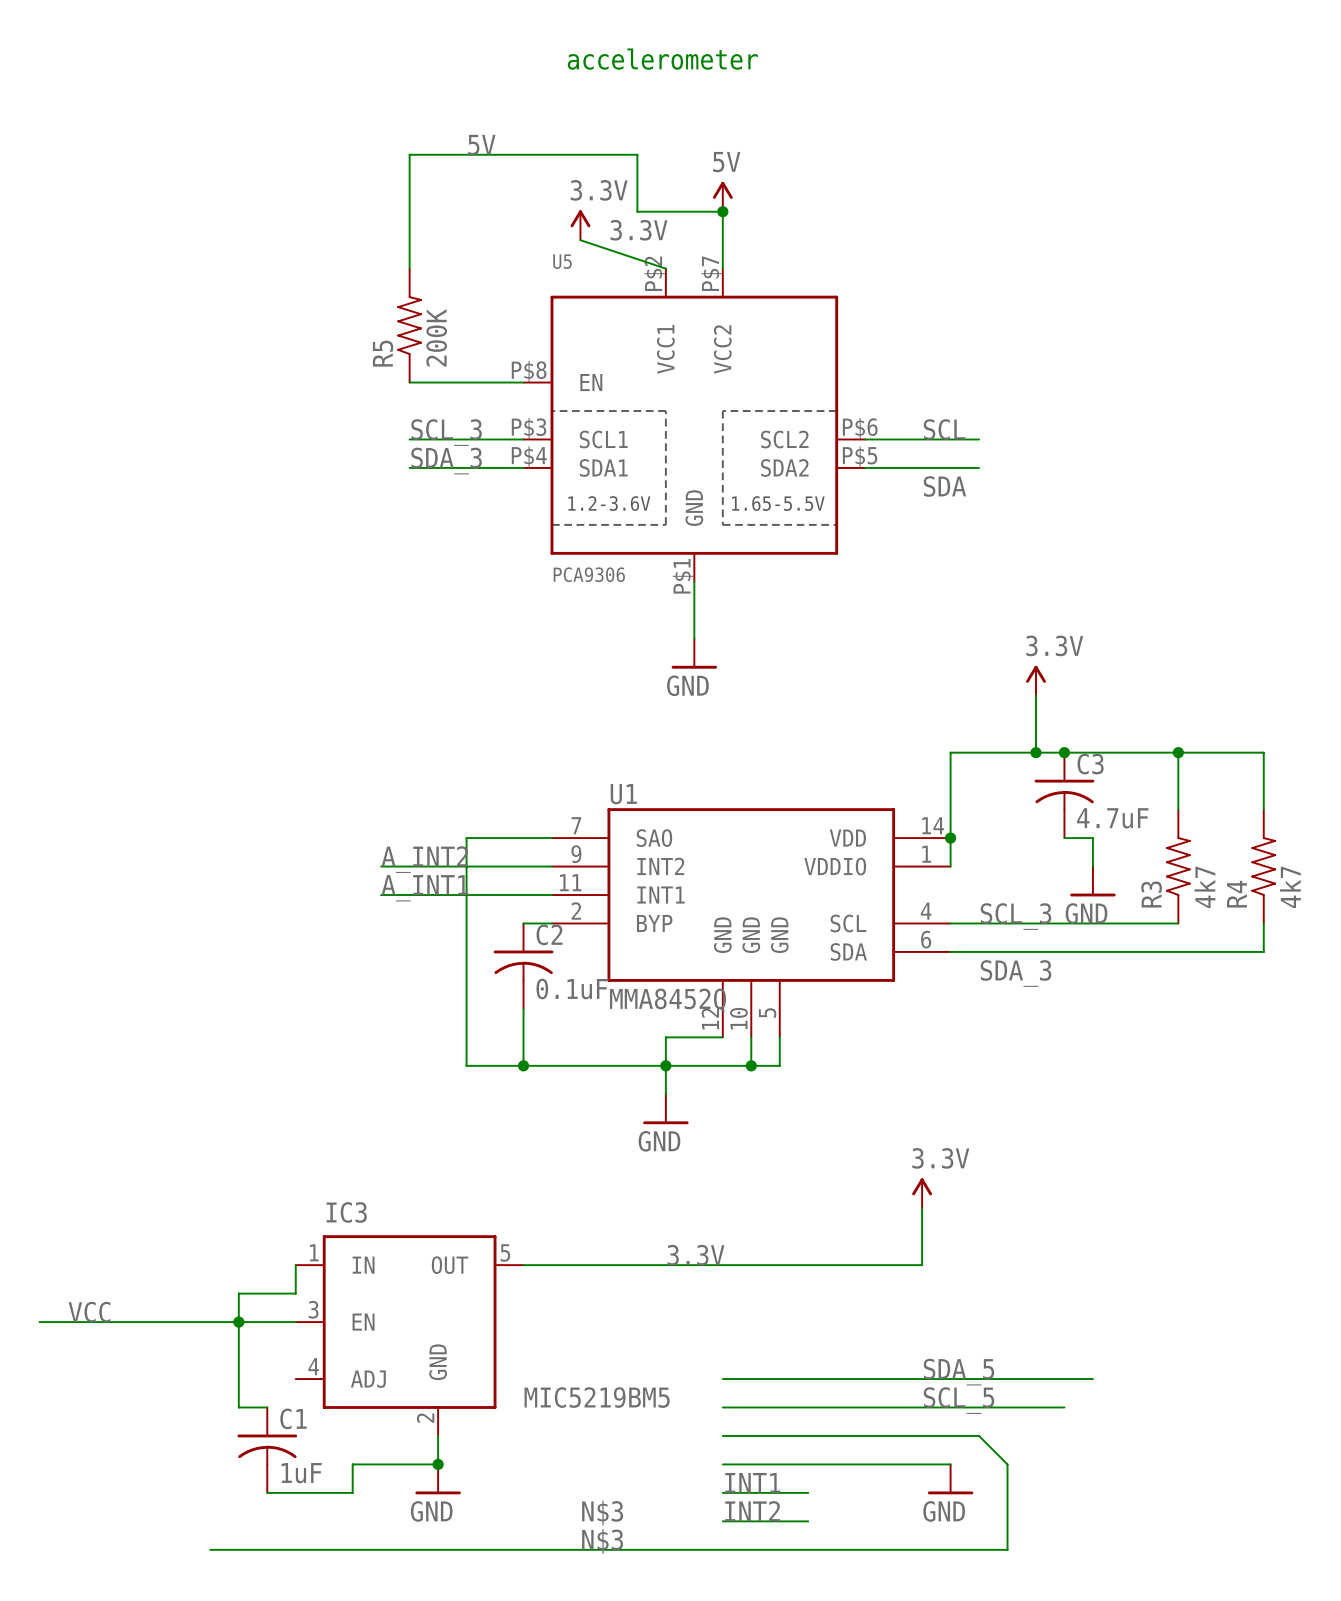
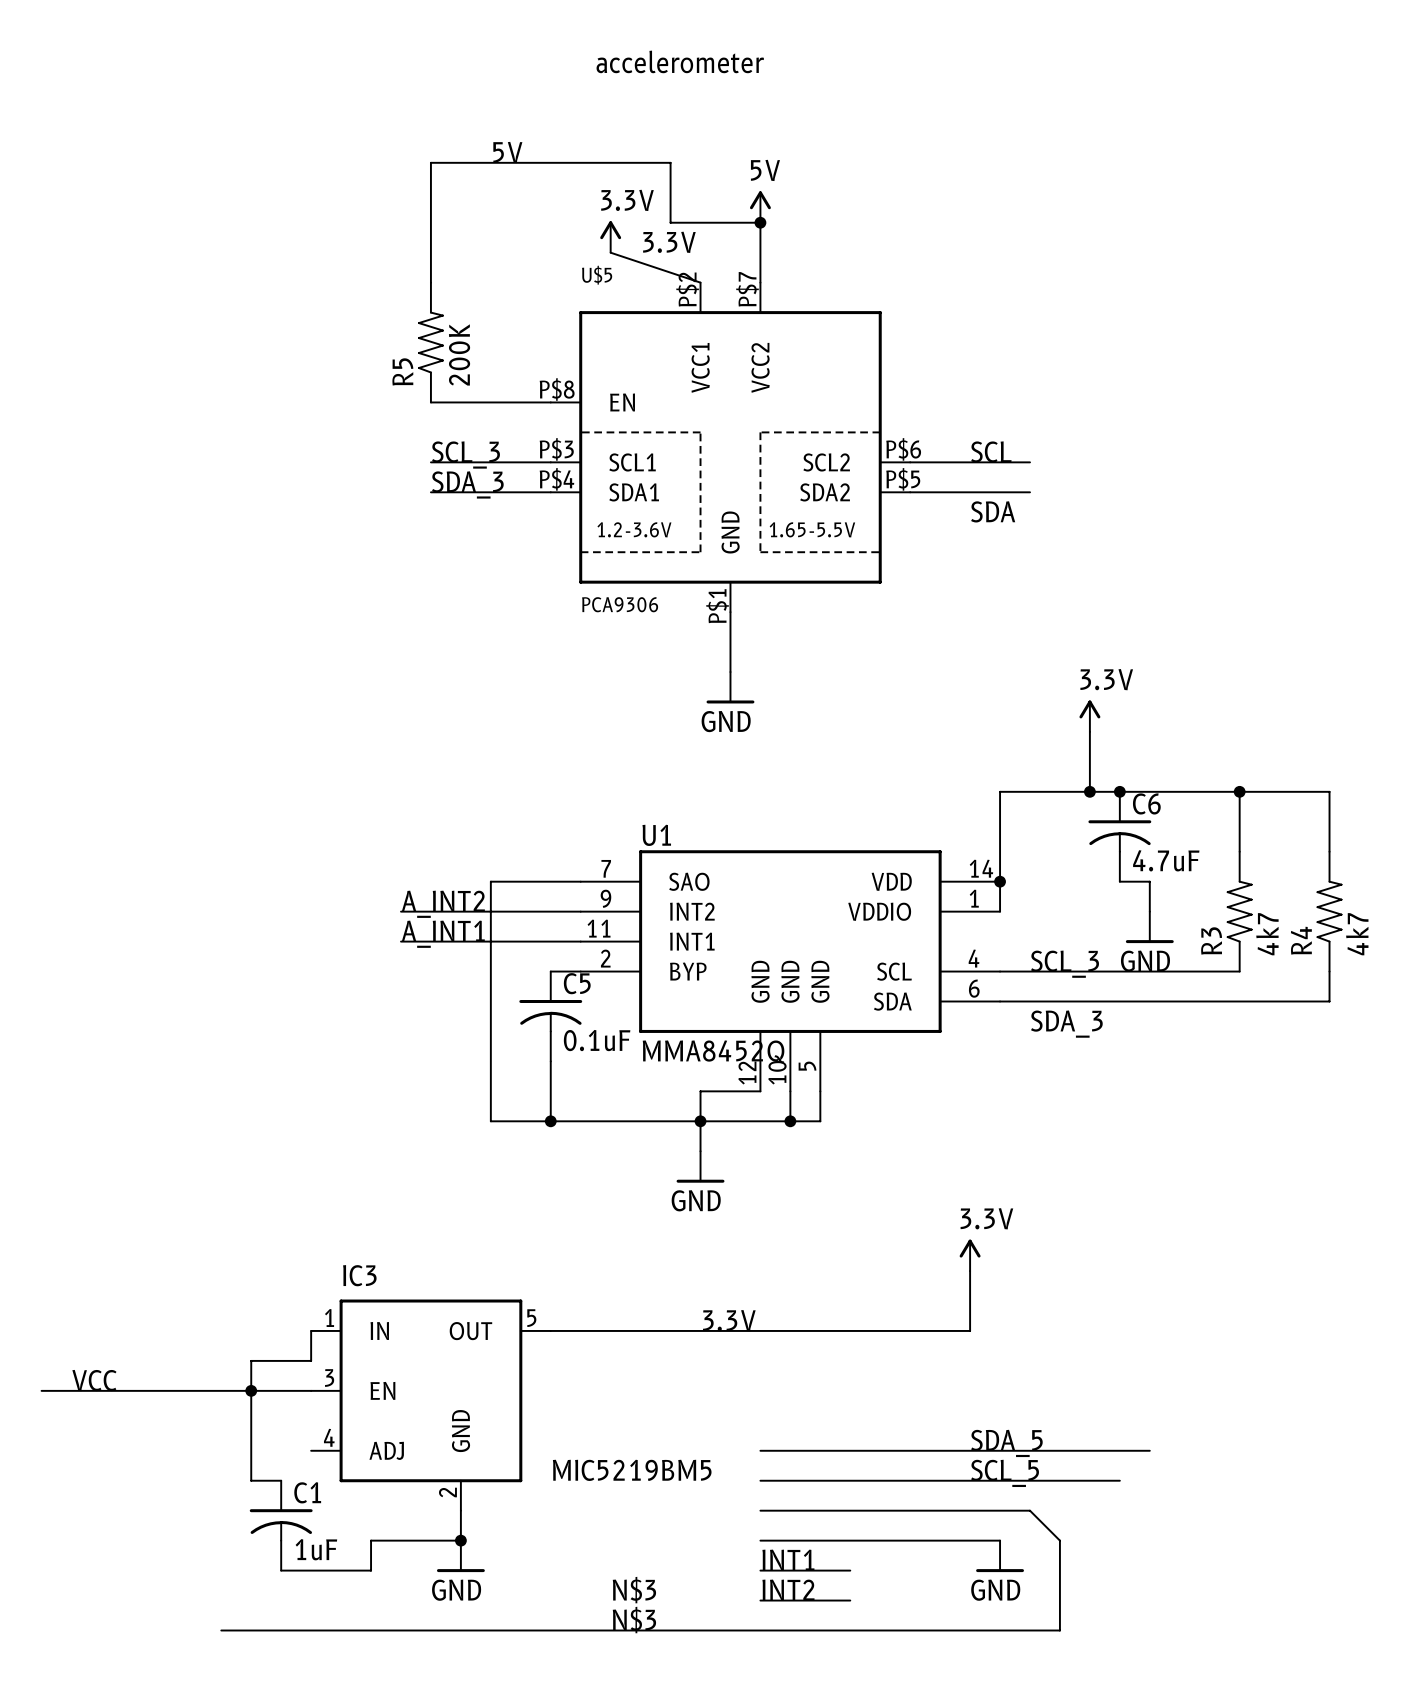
U5 name: U5 (562, 261) -> U$5 (597, 275)
C3 name: C3 (1090, 764) -> C6 (1146, 803)
C2 name: C2 (549, 934) -> C5 (577, 983)

